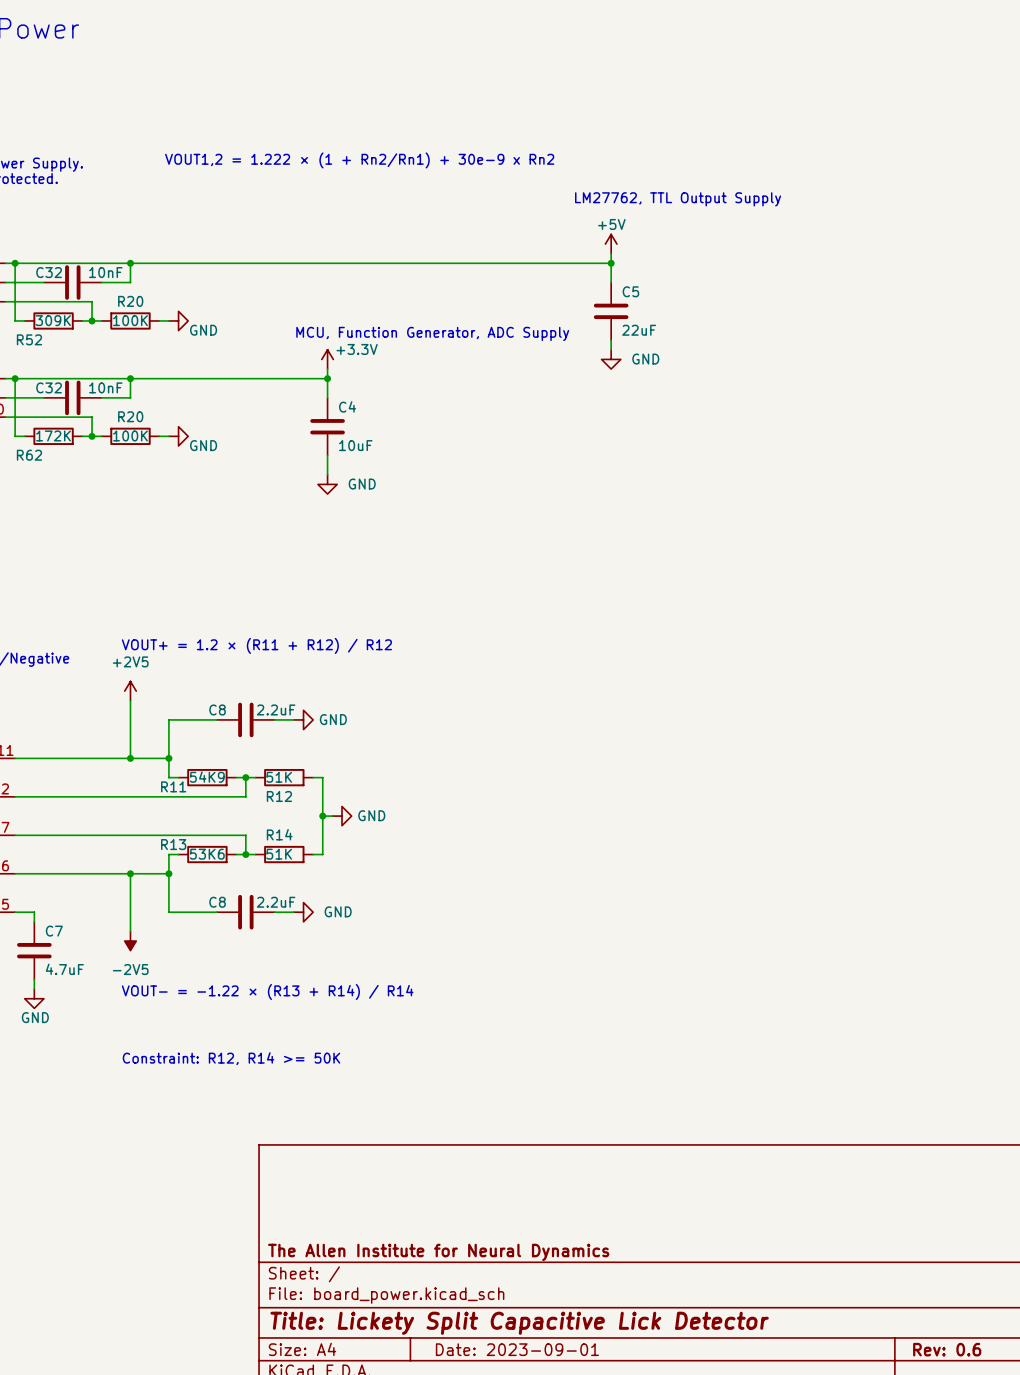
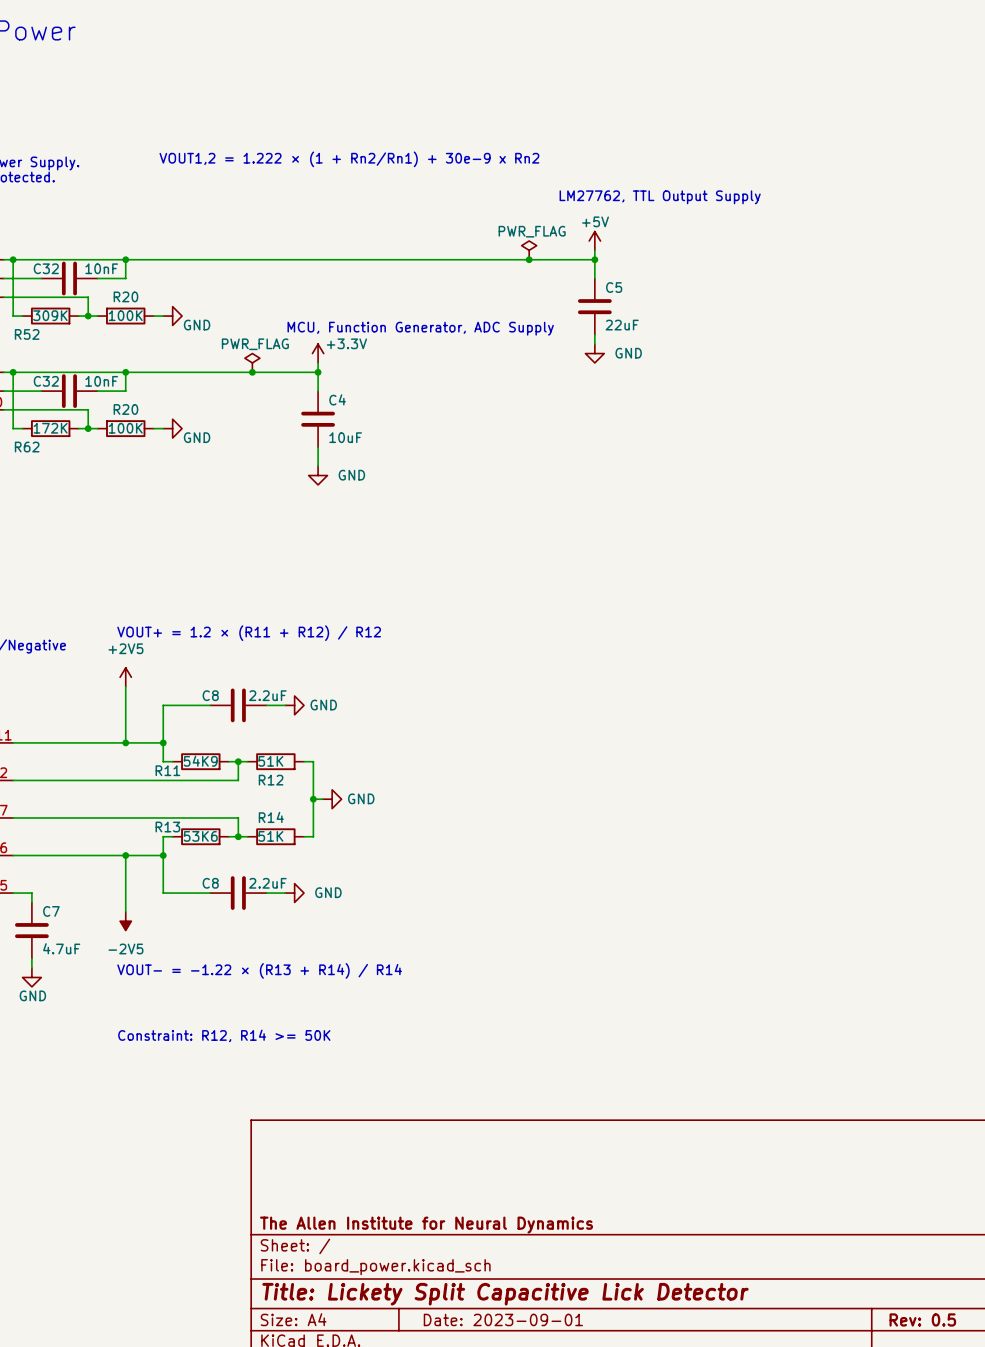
power symbol: none -> PWR_FLAG (529, 250)
junction: none -> (529, 259)
power symbol: none -> PWR_FLAG (252, 362)
junction: none -> (252, 372)
title block: Rev: 0.6 (947, 1349) -> Rev: 0.5 (922, 1319)

